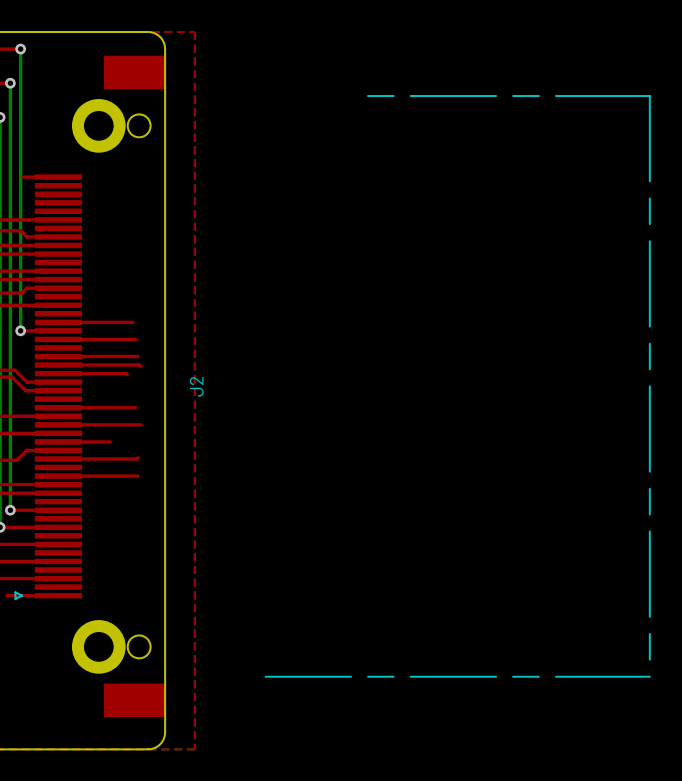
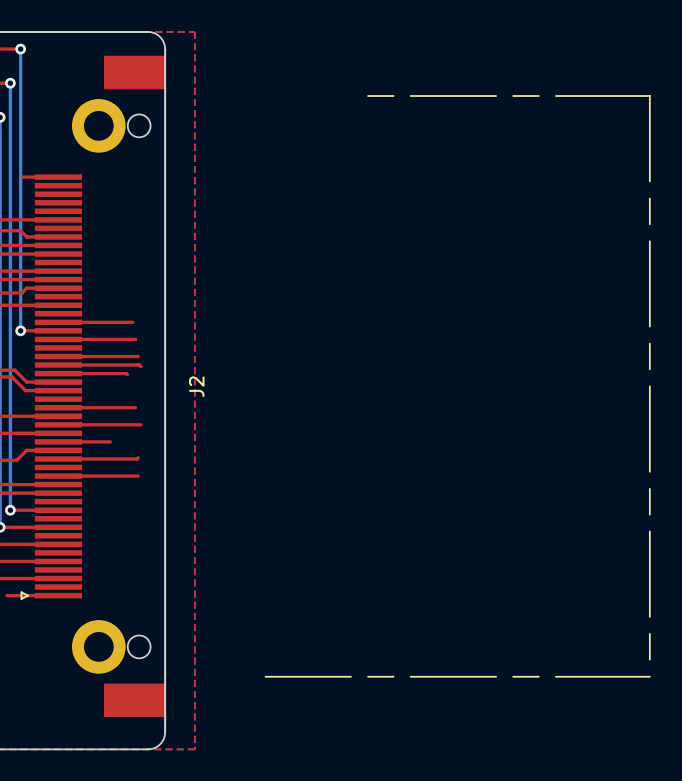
J2 footprint: [14, 55, 651, 718] -> [20, 55, 651, 718]

